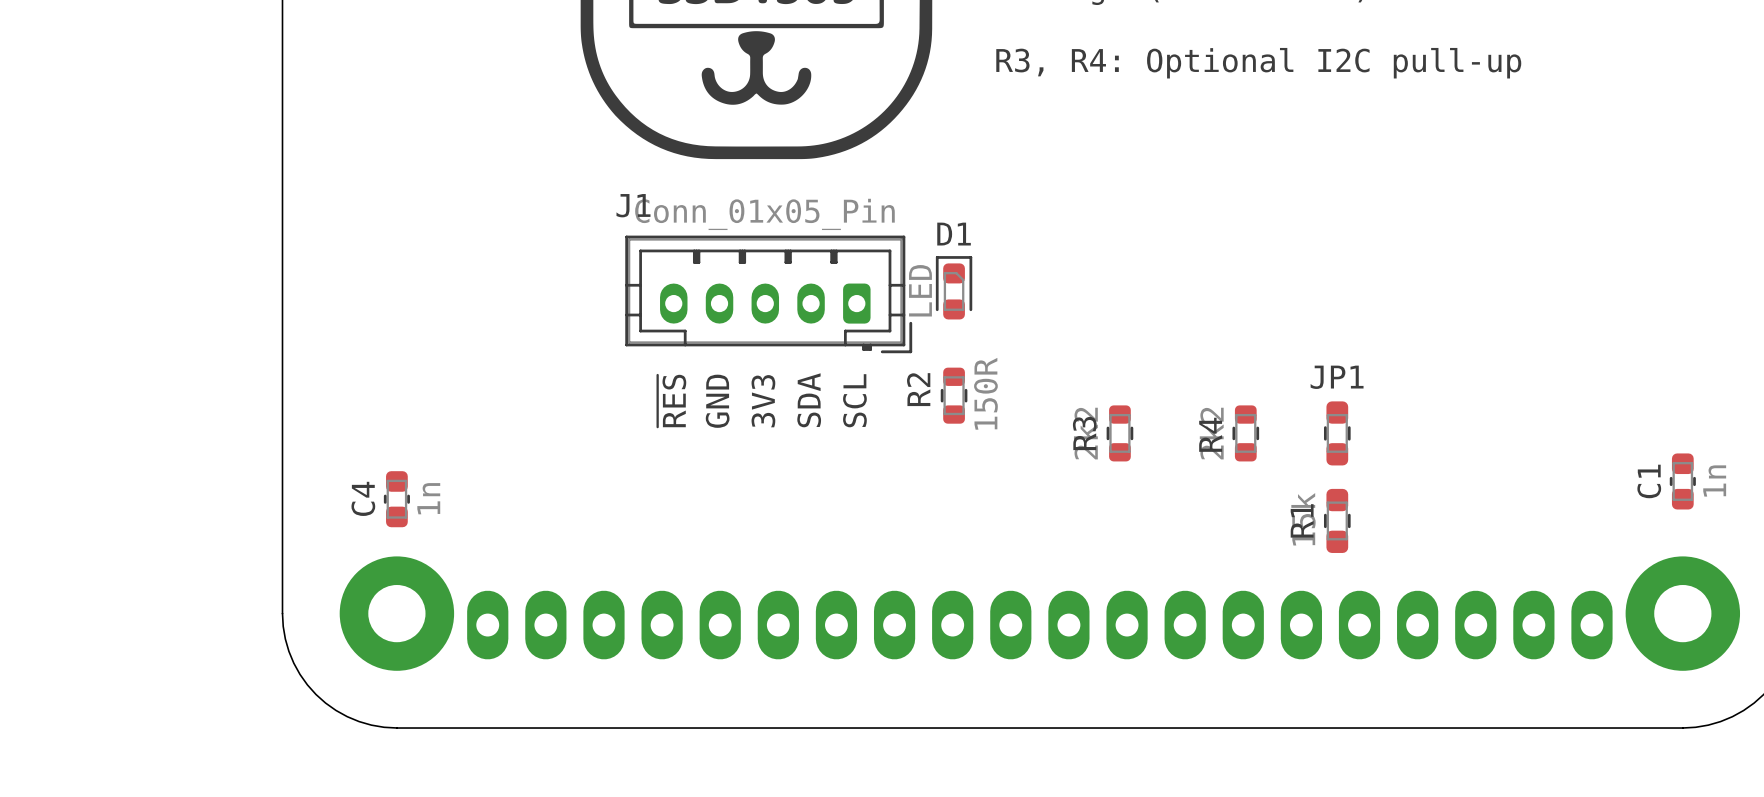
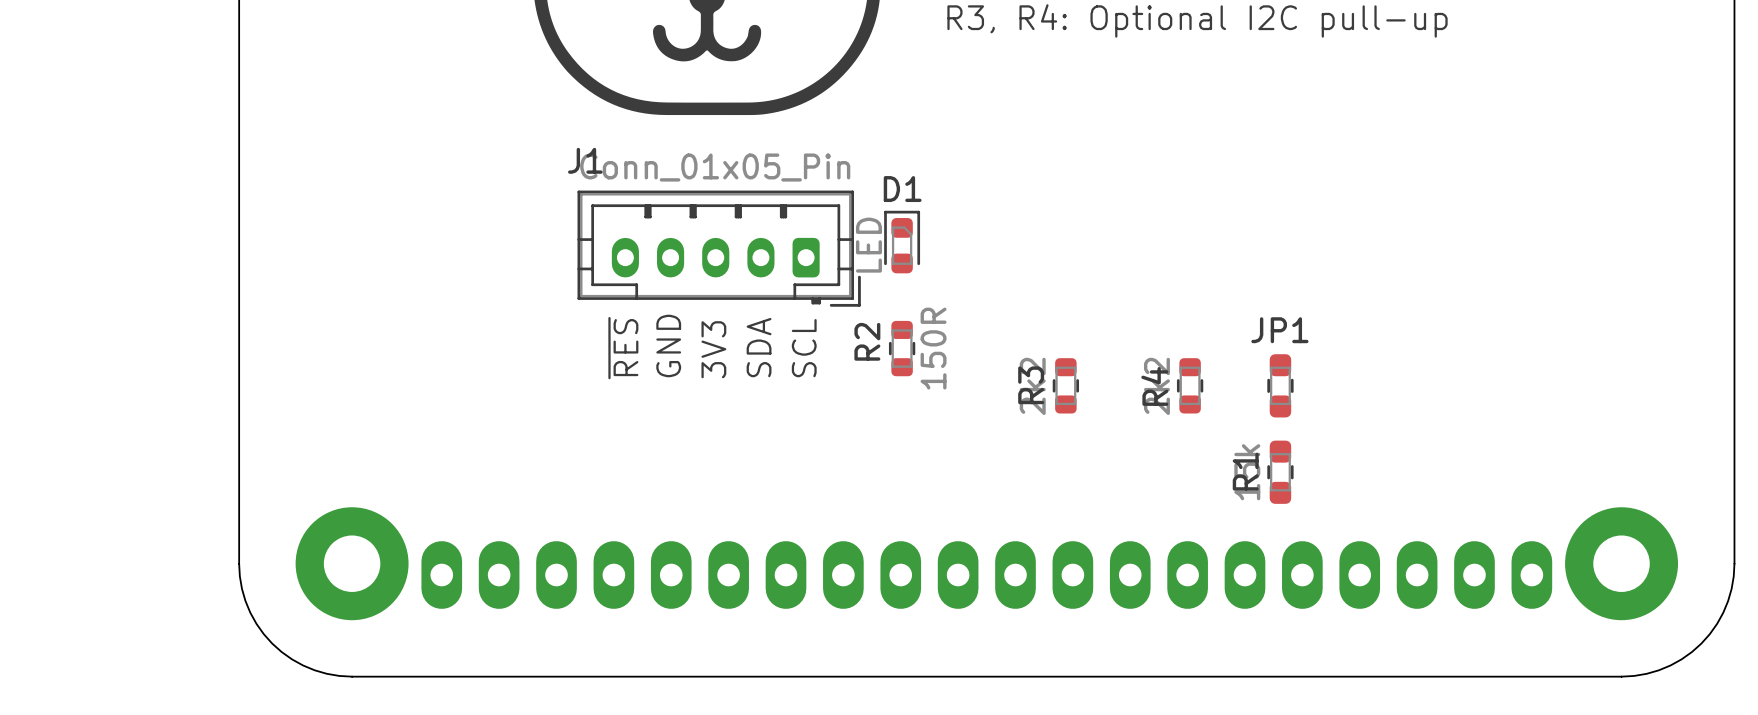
C1: 1n (1682, 481) -> none
C4: 1n (396, 499) -> none

